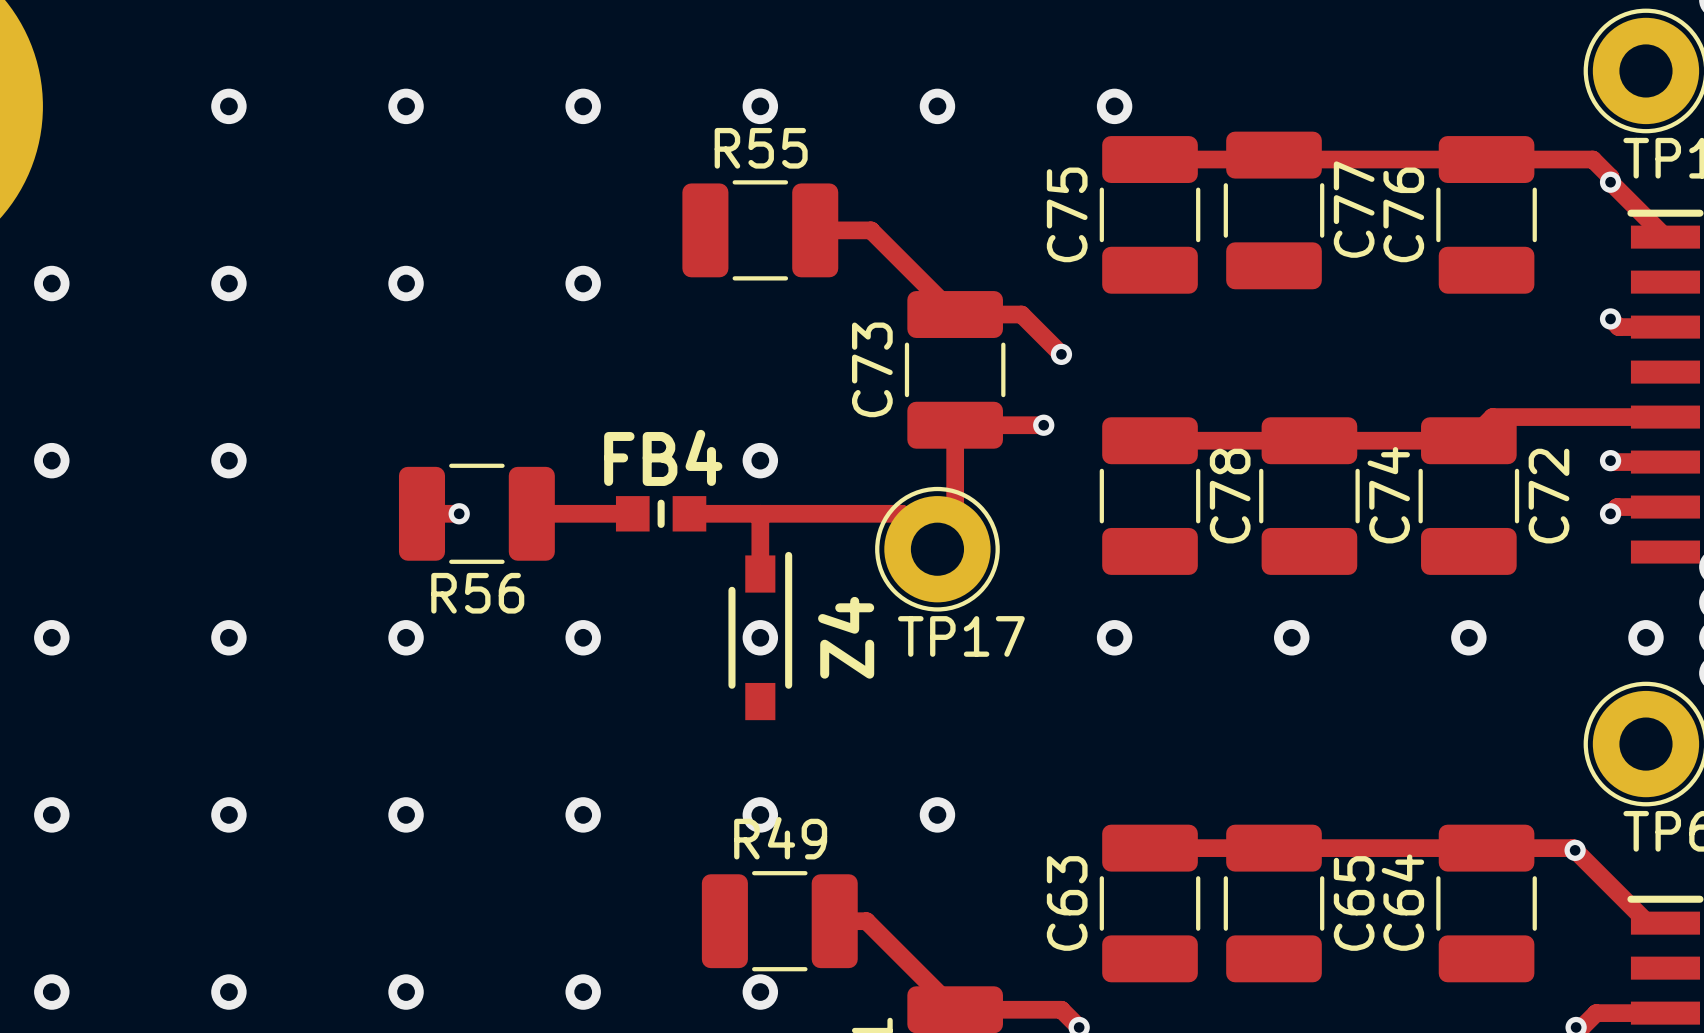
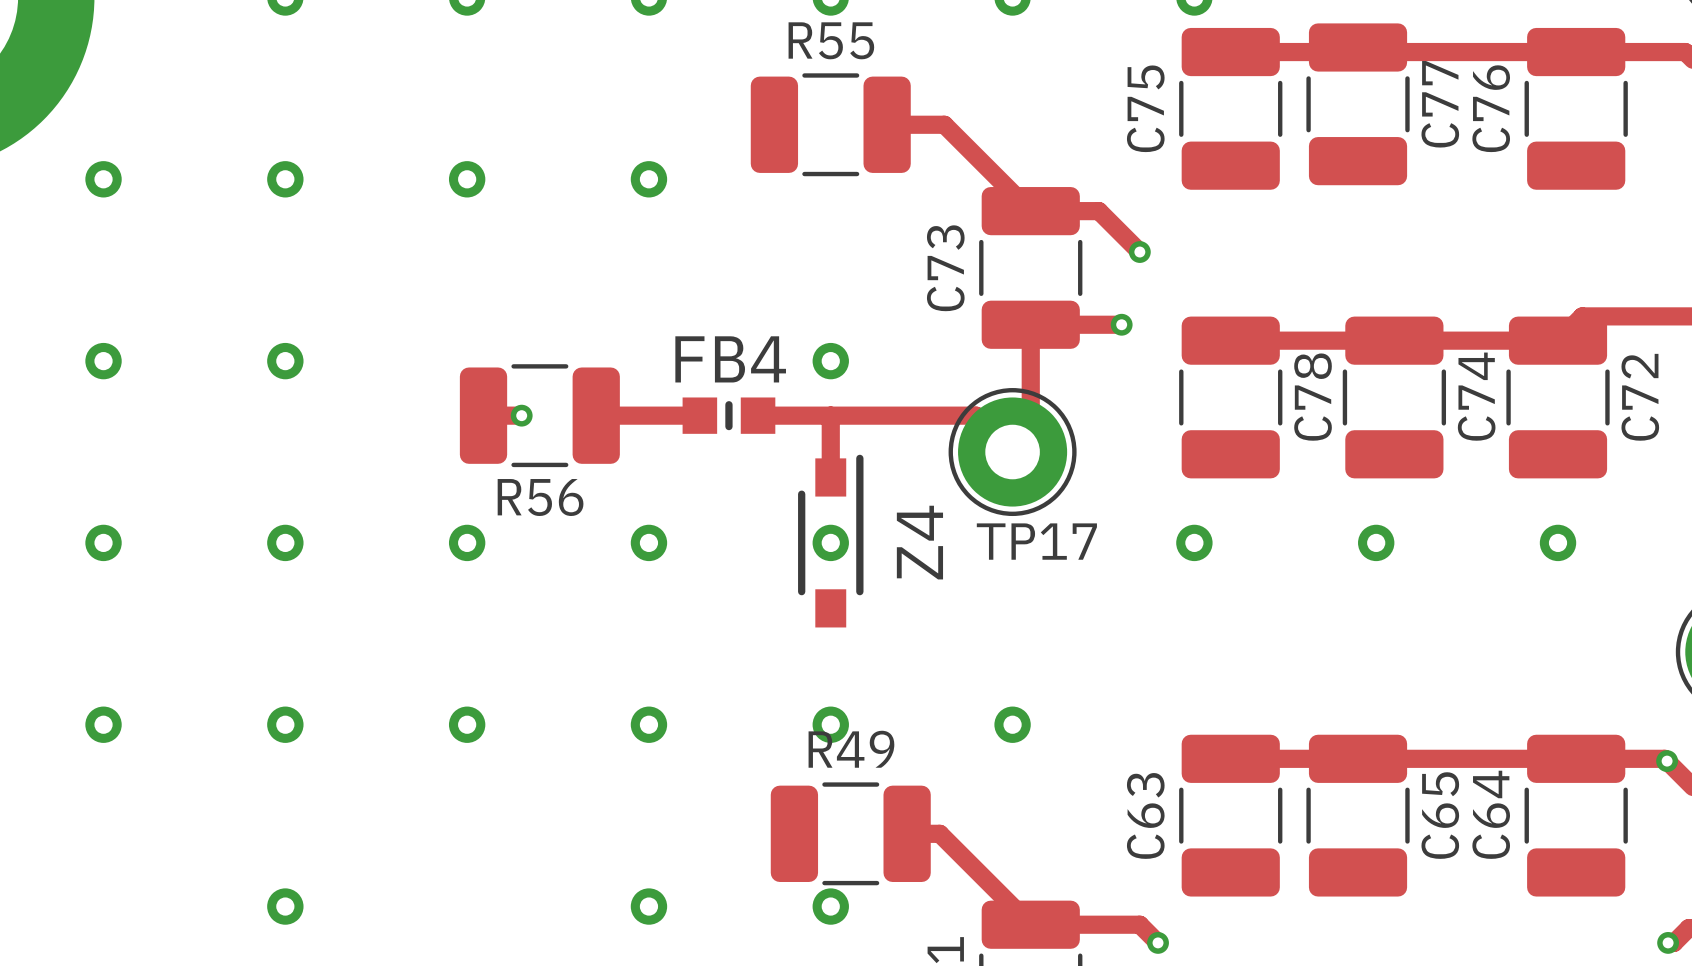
via: (51, 992) -> none
via: (406, 992) -> none

